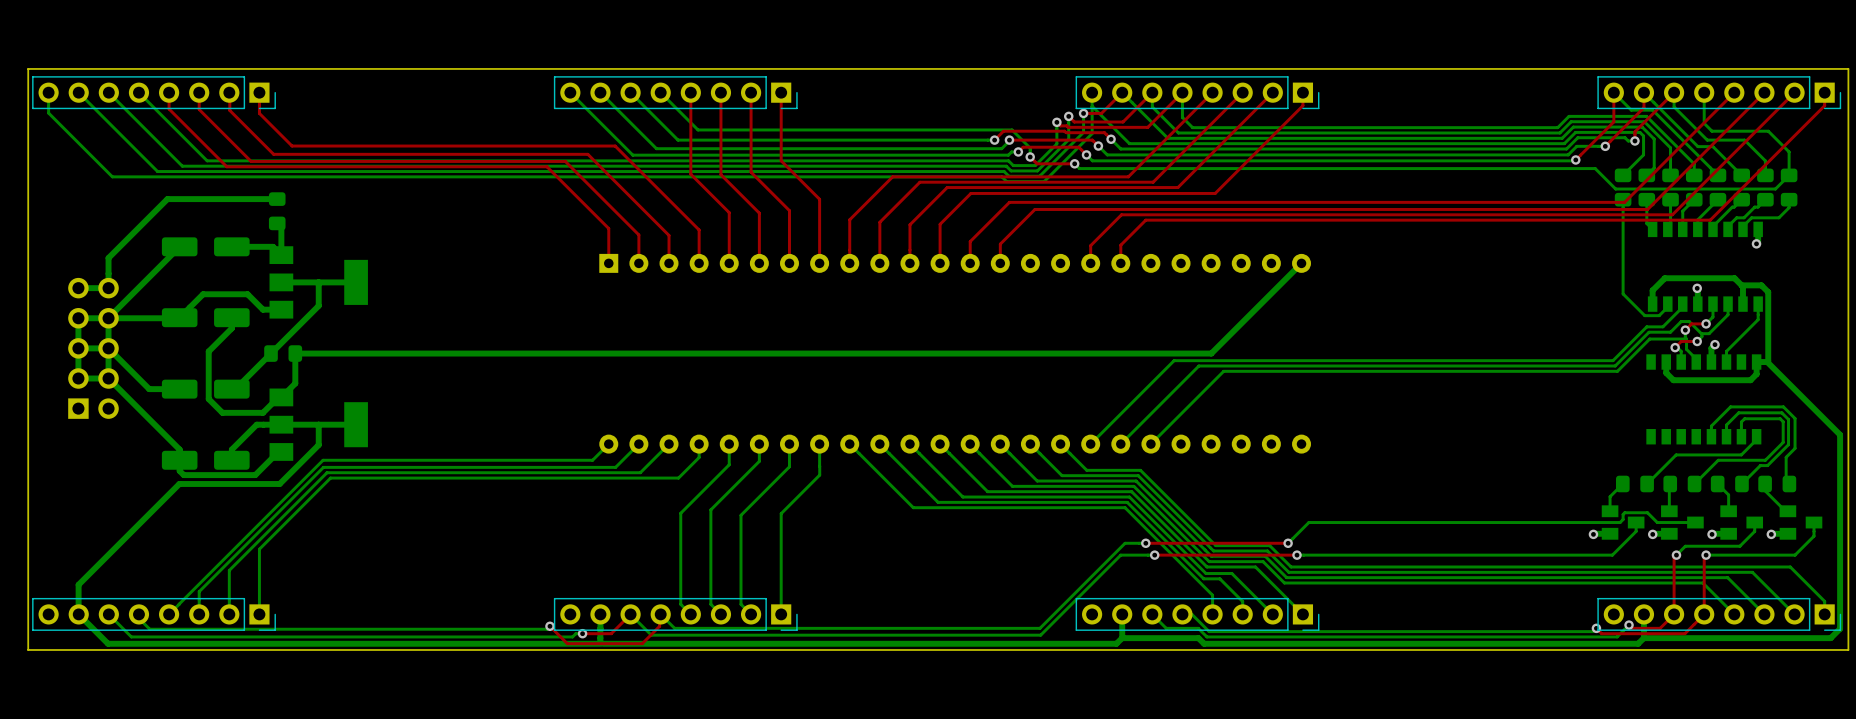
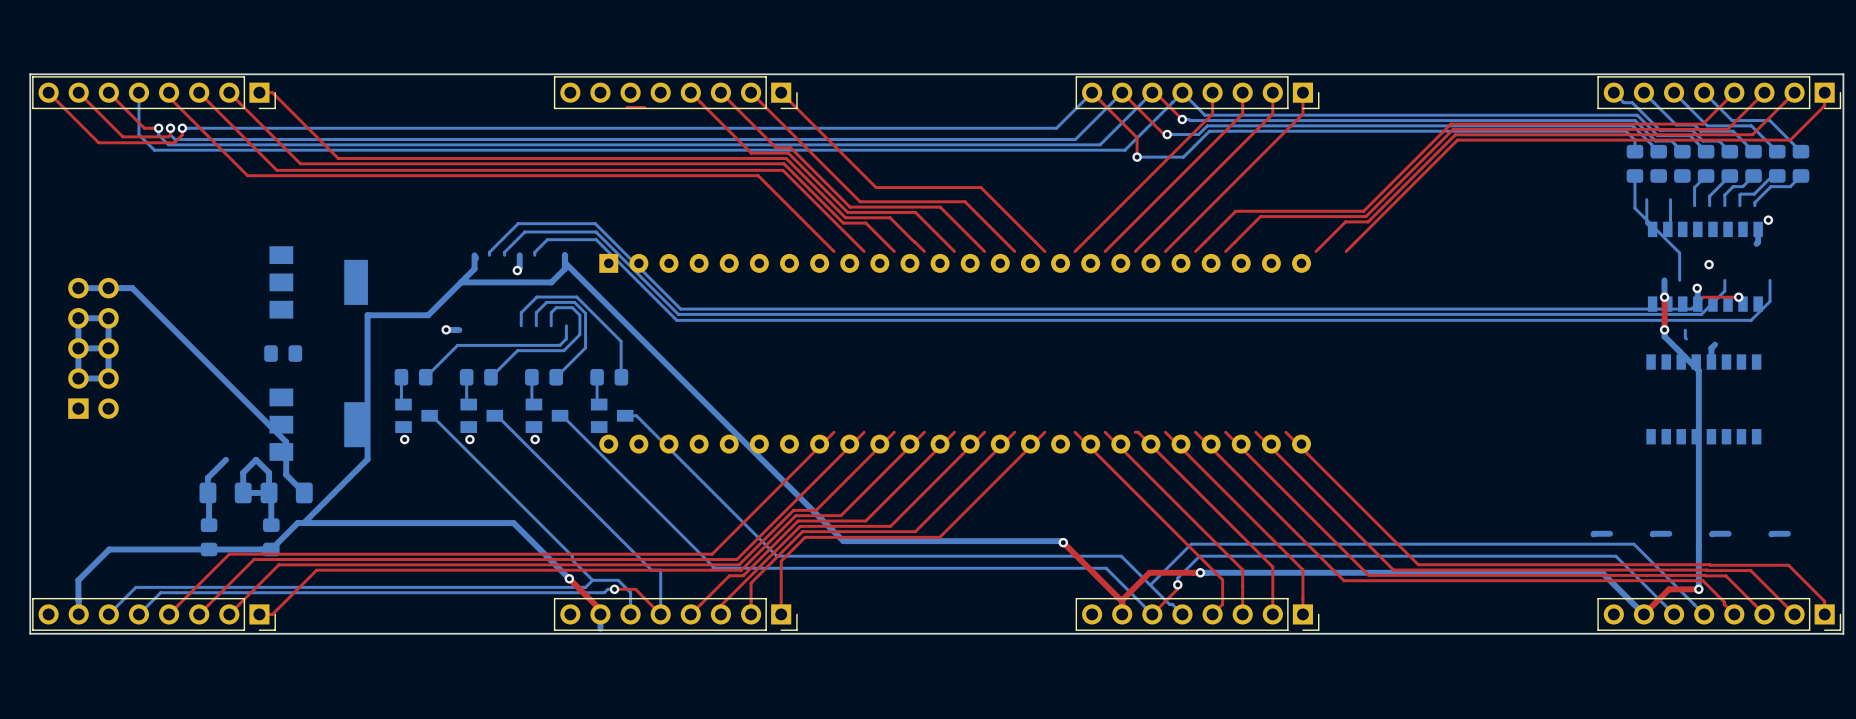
board edge: (28, 68) (28, 649) (1848, 649) (1848, 68) (28, 68) -> (30, 74) (30, 633) (1843, 633) (1843, 74) (30, 74)
bottom track: (48, 92) (48, 113) (112, 176) (1001, 176) (1006, 181) (1044, 181) (1092, 133) (1092, 106) -> none
top track: none -> (48, 92) (98, 142) (174, 142) (182, 134) (182, 128)
bottom track: (78, 92) (157, 171) (1004, 171) (1008, 176) (1039, 176) (1083, 132) (1083, 113) -> none
top track: none -> (78, 92) (122, 136) (168, 136) (170, 128)
bottom track: (108, 92) (182, 166) (1006, 166) (1011, 170) (1037, 170) (1068, 139) (1068, 116) -> none
top track: none -> (108, 92) (144, 128) (158, 128)
bottom track: (138, 92) (207, 160) (1008, 160) (1013, 165) (1035, 165) (1056, 143) (1056, 122) -> (138, 92) (138, 134) (154, 150) (1124, 150) (1182, 92) (1204, 115) (1637, 115) (1657, 135) (1690, 135) (1706, 151)
top track: (199, 92) (199, 109) (251, 161) (565, 161) (638, 234) (638, 263) -> (199, 92) (276, 170) (783, 170) (864, 251)
top track: (259, 92) (259, 113) (292, 146) (615, 146) (699, 229) (699, 263) -> (259, 92) (272, 92) (338, 158) (786, 158) (845, 217) (890, 217) (924, 251)
bottom track: (570, 92) (632, 155) (1008, 155) (1011, 151) (1018, 151) -> none
bottom track: (600, 92) (656, 148) (1001, 148) (1009, 140) -> none
bottom track: (630, 92) (678, 140) (994, 140) -> none
bottom track: (660, 92) (698, 129) (1012, 129) (1030, 148) (1030, 157) -> none
top track: (690, 92) (690, 174) (729, 212) (729, 263) -> (690, 92) (751, 153) (788, 153) (847, 212) (915, 212) (954, 251)
top track: (720, 92) (720, 174) (759, 213) (759, 263) -> (720, 92) (776, 147) (790, 147) (849, 207) (940, 207) (984, 251)
top track: (751, 92) (751, 172) (789, 210) (789, 263) -> (751, 92) (860, 201) (965, 201) (1014, 251)
top track: (781, 92) (781, 160) (819, 199) (819, 263) -> (781, 92) (876, 187) (947, 187)
bottom track: (1092, 92) (1092, 106) (1129, 143) (1564, 143) (1575, 132) (1639, 132) (1643, 135) (1643, 154) (1623, 175) -> (1092, 92) (1056, 128) (182, 128)
top track: none -> (1092, 92) (1137, 137) (1137, 157)
bottom track: (1122, 92) (1167, 138) (1562, 138) (1573, 127) (1642, 127) (1654, 139) (1654, 167) (1646, 175) -> (1122, 92) (1075, 139) (175, 139) (170, 134) (170, 128)
top track: (1122, 92) (1101, 113) (1083, 113) -> (1122, 92) (1164, 134) (1167, 134)
bottom track: (1152, 92) (1152, 106) (1178, 132) (1559, 132) (1571, 121) (1644, 121) (1670, 147) (1670, 175) -> (1152, 92) (1100, 144) (168, 144) (158, 134) (158, 128)
top track: (1152, 92) (1122, 122) (1074, 122) (1068, 116) -> (1152, 92) (1155, 92) (1182, 119)
bottom track: (1182, 92) (1182, 117) (1192, 127) (1557, 127) (1569, 116) (1646, 116) (1694, 164) (1694, 175) -> none
top track: (1182, 92) (1147, 127) (1068, 127) (1060, 125) (1056, 122) -> none
top track: (1212, 92) (1128, 176) (892, 176) (849, 219) (849, 263) -> (1212, 92) (1212, 113) (1075, 251)
top track: (1242, 92) (1153, 182) (919, 182) (879, 222) (879, 263) -> (1242, 92) (1242, 113) (1105, 251)
top track: (1272, 92) (1177, 187) (980, 187) -> (1272, 92) (1272, 113) (1135, 251)
top track: (1613, 92) (1613, 121) (1575, 159) -> none
top track: (1643, 92) (1643, 107) (1605, 146) -> none
bottom track: (1674, 92) (1674, 106) (1707, 140) (1744, 140) (1765, 160) (1765, 175) -> (1674, 92) (1707, 125) (1751, 125) (1778, 151)
top track: (1674, 92) (1634, 131) (1634, 140) -> none
bottom track: (1704, 92) (1704, 123) (1712, 131) -> (1676, 124) (1694, 124) (1700, 131) (1712, 131)
bottom track: none -> (1704, 92) (1732, 120) (1769, 120) (1800, 151)
top track: (229, 93) (229, 110) (273, 154) (587, 154) (669, 235) (669, 263) -> (229, 93) (300, 163) (784, 163) (843, 223) (865, 223) (894, 251)
top track: (169, 97) (169, 109) (226, 166) (547, 166) (608, 228) (608, 263) -> (169, 97) (247, 175) (758, 175) (834, 251)
bottom track: (1623, 102) (1631, 110) (1652, 110) (1717, 175) -> (1623, 102) (1632, 102) (1659, 130) (1692, 130) (1702, 140) (1719, 140) (1729, 151)
top track: (1302, 105) (1215, 193) (970, 193) (940, 224) (940, 263) -> (1302, 105) (1302, 113) (1165, 251)
top track: none -> (627, 107) (644, 107)
via: (1083, 113) -> none
via: (1068, 116) -> none
bottom track: none -> (1182, 119) (1635, 120) (1655, 140) (1671, 140) (1682, 151)
via: none -> (1182, 119)
via: (1056, 122) -> none
bottom track: (1676, 124) (1697, 146) (1712, 146) (1741, 175) -> none
top track: (1702, 124) (1624, 202) (1009, 202) (970, 241) (970, 263) -> (1702, 124) (1450, 124) (1363, 211) (1235, 211) (1195, 251)
via: none -> (158, 128)
via: none -> (170, 128)
via: none -> (182, 128)
top track: (1727, 129) (1647, 209) (1034, 209) (1000, 244) (1000, 263) -> (1727, 129) (1453, 129) (1365, 216) (1260, 216) (1225, 251)
bottom track: (1733, 131) (1768, 131) (1789, 151) (1789, 175) (1775, 189) (1615, 189) (1595, 168) (1079, 168) (1074, 163) -> (1733, 131) (1753, 151)
bottom track: none -> (1167, 134) (1198, 134) (1207, 125) (1632, 125) (1658, 151)
via: none -> (1167, 134)
top track: (1752, 134) (1672, 214) (1121, 214) (1090, 245) (1090, 263) -> (1752, 134) (1455, 134) (1368, 221) (1345, 221) (1315, 251)
bottom track: (1111, 139) (1120, 149) (1566, 149) (1577, 137) (1624, 137) (1628, 140) (1634, 140) -> none
top track: (1111, 139) (1104, 132) (1003, 131) (994, 140) -> none
via: (1111, 139) -> none
via: (994, 140) -> none
top track: (1009, 140) (1092, 140) (1098, 146) -> none
via: (1009, 140) -> none
via: (1634, 140) -> none
top track: (1790, 140) (1710, 220) (1145, 220) (1120, 245) (1120, 263) -> (1790, 140) (1457, 140) (1346, 251)
bottom track: (1098, 146) (1107, 154) (1568, 154) (1576, 146) (1605, 146) -> none
via: (1098, 146) -> none
via: (1605, 146) -> none
top track: (1018, 151) (1023, 147) (1078, 147) (1086, 154) -> none
via: (1018, 151) -> none
bottom track: none -> (1634, 151) (1634, 140) (1626, 131) (1209, 131) (1183, 157) (1137, 157)
bottom track: (1086, 154) (1092, 160) (1575, 159) -> none
via: (1086, 154) -> none
top track: (1030, 157) (1037, 163) (1074, 163) -> none
via: (1030, 157) -> none
via: none -> (1137, 157)
via: (1575, 159) -> none
via: (1074, 163) -> none
part: none -> (1634, 163)
part: none -> (1658, 163)
part: none -> (1682, 163)
part: none -> (1706, 163)
part: none -> (1729, 163)
part: none -> (1753, 163)
part: none -> (1777, 163)
part: none -> (1800, 163)
bottom track: none -> (1634, 175) (1634, 208) (1679, 252) (1679, 280)
bottom track: none -> (1753, 175) (1742, 186) (1733, 186) (1724, 195) (1724, 205)
bottom track: none -> (1777, 175) (1772, 175) (1754, 194) (1740, 194) (1739, 205)
bottom track: none -> (1800, 175) (1790, 186) (1770, 186) (1754, 202) (1754, 205)
top track: (947, 187) (909, 224) (909, 263) -> none
top track: none -> (980, 187) (1044, 251)
part: (1623, 187) -> none
part: (1646, 187) -> none
part: (1670, 187) -> none
part: (1694, 187) -> none
part: (1717, 187) -> none
part: (1741, 187) -> none
part: (1765, 187) -> none
part: (1789, 187) -> none
bottom track: (277, 199) (167, 199) (108, 258) (108, 288) -> (304, 492) (286, 474) (286, 442) (132, 288) (108, 288)
bottom track: (1623, 199) (1623, 293) (1644, 315) (1659, 315) (1667, 307) (1667, 304) -> none
bottom track: (1694, 199) (1682, 211) (1682, 229) -> (1706, 175) (1694, 187) (1694, 205)
bottom track: (1717, 199) (1697, 219) (1697, 229) -> (1729, 175) (1709, 196) (1709, 205)
bottom track: (1741, 199) (1712, 226) (1712, 229) -> none
bottom track: (1765, 199) (1744, 217) (1736, 217) (1728, 226) (1728, 229) -> none
bottom track: (1789, 199) (1789, 207) (1778, 217) (1751, 217) (1742, 226) (1742, 229) -> none
part: (277, 211) -> none
via: none -> (1768, 220)
bottom track: (277, 223) (281, 227) (281, 255) (273, 246) (231, 246) -> none
via: (1756, 243) -> none
bottom track: (179, 246) (108, 318) (179, 318) (203, 294) (247, 294) (263, 309) (281, 309) -> none
part: (205, 246) -> none
bottom track: none -> (474, 255) (474, 268) (428, 315) (367, 315) (367, 459) (303, 523)
bottom track: none -> (489, 255) (489, 252) (518, 223) (595, 223) (680, 309) (1691, 309) (1703, 297)
bottom track: none -> (504, 255) (504, 252) (524, 232) (596, 232) (678, 314) (1701, 314) (1724, 291) (1724, 280)
bottom track: none -> (519, 255) (519, 268) (517, 270)
bottom track: none -> (534, 255) (534, 252) (547, 239) (596, 239) (676, 320) (1751, 320) (1770, 301) (1770, 280)
bottom track: none -> (564, 255) (564, 268) (551, 282) (461, 282)
bottom track: none -> (564, 262) (843, 541) (1063, 542)
bottom track: (1301, 263) (1211, 353) (295, 353) (295, 383) (263, 412) (222, 412) (208, 399) (208, 351) (231, 328) (231, 317) (243, 317) -> none
via: none -> (1709, 264)
via: none -> (517, 270)
bottom track: none -> (1664, 280) (1664, 297)
bottom track: (281, 282) (356, 282) -> none
bottom track: (318, 282) (318, 305) (235, 389) (231, 389) -> none
bottom track: (1741, 285) (1761, 285) (1768, 292) (1767, 362) -> none
top track: none -> (1664, 297) (1664, 329)
via: none -> (1664, 297)
top track: none -> (1703, 297) (1738, 297)
via: none -> (1738, 297)
bottom track: (1652, 304) (1652, 290) (1664, 278) (1734, 278) (1742, 286) (1742, 304) -> none
bottom track: (1682, 304) (1682, 307) (1662, 326) (1646, 326) (1613, 360) (1174, 360) (1090, 444) -> none
bottom track: (1712, 304) (1712, 317) (1706, 323) -> none
bottom track: (1728, 304) (1728, 314) (1709, 333) (1701, 333) -> none
bottom track: (1758, 304) (1758, 319) (1726, 351) (1726, 362) -> none
part: (205, 317) -> none
top track: (1706, 323) (1691, 323) (1685, 330) -> none
via: (1706, 323) -> none
bottom track: none -> (521, 325) (521, 312) (536, 297) (576, 297) (621, 341) (621, 377)
bottom track: none -> (536, 325) (536, 312) (546, 302) (574, 302) (585, 313) (585, 347) (556, 377)
bottom track: none -> (551, 325) (551, 312) (556, 307) (572, 307) (579, 315) (579, 334) (563, 350) (517, 350) (490, 377)
bottom track: none -> (566, 325) (566, 338) (559, 345) (457, 345) (425, 377)
bottom track: none -> (446, 329) (459, 330)
via: none -> (446, 329)
bottom track: none -> (1664, 329) (1664, 336) (1698, 370) (1698, 589)
via: none -> (1664, 329)
via: (1685, 330) -> none
bottom track: (1697, 341) (1701, 334) (1689, 321) (1681, 321) (1670, 332) (1649, 332) (1615, 366) (1198, 366) (1120, 444) -> none
top track: (1697, 341) (1681, 341) (1675, 347) -> none
via: (1697, 341) -> none
via: (1715, 344) -> none
via: (1675, 347) -> none
bottom track: (108, 348) (149, 389) (179, 389) -> none
bottom track: (1666, 362) (1666, 372) (1673, 380) (1750, 380) (1756, 374) (1756, 362) (1767, 362) -> none
bottom track: (1696, 362) (1696, 359) (1686, 349) (1686, 339) (1649, 339) (1617, 371) (1223, 371) (1150, 444) -> none
bottom track: (1767, 362) (1840, 434) (1840, 628) (1830, 638) (1643, 638) -> none
bottom track: none -> (401, 377) (401, 402) (403, 404)
part: none -> (413, 377)
bottom track: none -> (466, 377) (466, 402) (468, 404)
part: none -> (478, 377)
bottom track: none -> (531, 377) (531, 402) (533, 404)
part: none -> (544, 377)
bottom track: none -> (597, 377) (597, 402) (599, 404)
part: none -> (609, 377)
bottom track: (108, 378) (179, 449) (179, 470) (183, 475) (255, 475) (278, 451) (281, 451) -> none
part: (205, 389) -> none
part: none -> (416, 415)
bottom track: none -> (429, 415) (431, 415) (572, 556) (572, 559) (592, 580)
part: none -> (481, 415)
part: none -> (547, 415)
part: none -> (612, 415)
bottom track: (318, 424) (318, 444) (279, 483) (179, 483) (78, 584) (78, 614) (108, 643) (600, 643) -> none
bottom track: (356, 424) (256, 424) (231, 449) (231, 460) -> none
top track: none -> (834, 432) (712, 554) (229, 554) (169, 614)
top track: none -> (864, 432) (736, 559) (254, 559) (199, 614)
top track: none -> (894, 432) (816, 510) (793, 510) (739, 564) (278, 564) (229, 614)
top track: none -> (924, 432) (841, 515) (795, 515) (741, 570) (316, 570) (272, 614) (259, 614)
top track: none -> (954, 432) (865, 521) (798, 521) (743, 575) (729, 575) (690, 614)
top track: none -> (984, 432) (890, 526) (800, 526) (720, 605) (720, 614)
top track: none -> (1014, 432) (915, 531) (802, 531) (751, 583) (751, 614)
top track: none -> (1044, 432) (939, 537) (805, 537) (781, 561) (781, 614)
top track: none -> (1075, 432) (1222, 579) (1222, 604) (1212, 614)
top track: none -> (1105, 432) (1242, 569) (1242, 614)
top track: none -> (1135, 432) (1138, 432) (1272, 566) (1272, 614)
top track: none -> (1165, 432) (1302, 569) (1302, 614)
top track: none -> (1195, 432) (1344, 580) (1702, 580) (1734, 614)
top track: none -> (1225, 432) (1368, 575) (1725, 575) (1764, 614)
top track: none -> (1255, 432) (1393, 570) (1750, 570) (1794, 614)
top track: none -> (1285, 432) (1418, 564) (1788, 565) (1824, 601) (1824, 614)
bottom track: (1711, 436) (1711, 426) (1730, 406) (1783, 406) (1795, 418) (1795, 448) (1786, 457) (1786, 480) (1789, 483) -> none
bottom track: (1726, 436) (1726, 425) (1738, 412) (1781, 412) (1788, 419) (1788, 444) (1767, 465) (1760, 465) (1741, 483) -> none
bottom track: (1741, 436) (1741, 421) (1744, 418) (1780, 418) (1783, 421) (1783, 442) (1765, 460) (1718, 460) (1694, 483) -> none
bottom track: (1756, 436) (1756, 439) (1741, 454) (1676, 454) (1647, 483) -> none
via: none -> (404, 439)
via: none -> (469, 439)
via: none -> (535, 439)
bottom track: (608, 444) (592, 460) (323, 460) (179, 604) -> none
bottom track: (638, 444) (615, 467) (323, 467) (199, 591) (199, 614) -> none
bottom track: (669, 444) (640, 472) (327, 472) (229, 570) (229, 614) -> none
bottom track: (699, 444) (699, 457) (678, 478) (330, 478) (259, 549) (259, 614) -> none
bottom track: (729, 444) (729, 464) (680, 513) (680, 604) (690, 614) -> none
bottom track: (759, 444) (759, 461) (710, 509) (710, 604) (720, 614) -> none
bottom track: (789, 444) (789, 466) (740, 515) (740, 604) (751, 614) -> none
bottom track: (819, 444) (819, 466) -> none
bottom track: (849, 444) (913, 507) (1125, 507) (1212, 595) (1212, 614) -> none
bottom track: (879, 444) (938, 502) (1127, 502) (1203, 578) (1219, 578) (1242, 601) (1242, 614) -> none
bottom track: (909, 444) (962, 497) (1129, 497) (1205, 573) (1231, 573) (1272, 614) -> none
bottom track: (940, 444) (987, 491) (1131, 491) (1207, 566) (1255, 566) (1302, 614) -> none
bottom track: (970, 444) (1012, 486) (1133, 486) (1209, 561) (1263, 561) (1284, 583) (1702, 583) (1734, 614) -> none
bottom track: (1000, 444) (1037, 481) (1136, 481) (1211, 556) (1265, 556) (1286, 577) (1727, 577) (1764, 614) -> none
bottom track: (1030, 444) (1062, 475) (1138, 475) (1213, 550) (1267, 550) (1288, 572) (1752, 572) (1794, 614) -> none
bottom track: (1060, 444) (1086, 470) (1140, 470) (1215, 545) (1269, 545) (1291, 566) (1790, 566) (1824, 601) (1824, 614) -> none
bottom track: none -> (226, 459) (207, 477) (209, 525)
part: (205, 460) -> none
bottom track: (819, 466) (819, 475) (781, 513) (781, 614) -> none
bottom track: (1622, 483) (1610, 496) (1610, 511) -> none
part: (1634, 483) -> none
bottom track: (1670, 483) (1669, 511) -> none
part: (1682, 483) -> none
bottom track: (1717, 483) (1728, 494) (1728, 511) -> none
part: (1729, 483) -> none
bottom track: (1765, 483) (1765, 490) (1785, 511) (1787, 511) -> none
part: (1777, 483) -> none
part: none -> (225, 492)
part: none -> (286, 492)
bottom track: none -> (269, 495) (269, 472) (256, 459) (243, 472) (243, 492) (269, 492) (271, 495) (271, 525)
part: (1623, 522) -> none
bottom track: (1636, 522) (1636, 531) (1612, 555) (1297, 555) -> none
part: (1682, 522) -> none
bottom track: (1695, 522) (1657, 522) (1647, 512) (1624, 512) (1620, 522) (1308, 522) (1288, 543) -> none
part: (1741, 522) -> none
bottom track: (1754, 522) (1754, 531) (1739, 546) (1685, 546) (1676, 555) -> none
part: (1800, 522) -> none
bottom track: (1814, 522) (1814, 536) (1795, 555) (1706, 555) -> none
via: (1593, 534) -> none
via: (1652, 534) -> none
via: (1712, 534) -> none
via: (1771, 534) -> none
part: none -> (209, 537)
part: none -> (271, 537)
top track: none -> (1063, 542) (1122, 601)
via: none -> (1063, 542)
bottom track: (1145, 543) (1125, 543) (1039, 628) (674, 628) (660, 614) -> (494, 415) (497, 415) (651, 570) (660, 570) (660, 614)
top track: (1145, 543) (1288, 543) -> none
via: (1145, 543) -> none
via: (1288, 543) -> none
bottom track: (1154, 555) (1120, 555) (1040, 635) (651, 635) (630, 614) -> (592, 580) (618, 580) (630, 592) (630, 614)
top track: (1154, 555) (1297, 555) -> none
via: (1154, 555) -> none
via: (1297, 555) -> none
top track: (1676, 555) (1674, 557) (1674, 614) (1660, 628) (1632, 628) (1629, 625) -> none
via: (1676, 555) -> none
top track: (1706, 555) (1704, 557) (1704, 614) (1684, 633) (1601, 633) (1596, 628) -> none
via: (1706, 555) -> none
top track: none -> (1200, 572) (1149, 572) (1122, 600) (1122, 614)
via: none -> (1200, 572)
bottom track: none -> (569, 578) (513, 523) (297, 523) (271, 549) (109, 549) (78, 580) (78, 614)
top track: none -> (569, 578) (600, 609) (600, 614)
via: none -> (569, 578)
bottom track: none -> (1150, 584) (1191, 544) (1633, 544) (1704, 614)
bottom track: none -> (1177, 584) (1177, 578) (1199, 556) (1615, 556) (1674, 614)
top track: none -> (1177, 584) (1177, 589) (1152, 614)
via: none -> (1177, 584)
via: none -> (614, 589)
top track: none -> (1698, 589) (1669, 589) (1643, 614)
via: none -> (1698, 589)
bottom track: (108, 614) (131, 636) (572, 636) (575, 633) (582, 633) -> (108, 614) (135, 587) (585, 587) (592, 580)
bottom track: (138, 614) (138, 618) (149, 629) (547, 629) (549, 626) -> (138, 614) (160, 592) (604, 592) (607, 589) (614, 589)
top track: (630, 614) (611, 633) (582, 633) -> none
top track: (660, 614) (659, 626) (642, 643) (567, 643) (549, 626) -> (660, 614) (635, 589) (614, 589)
bottom track: (1122, 614) (1122, 638) (1116, 643) (603, 643) -> none
bottom track: (1152, 614) (1166, 628) (1198, 628) (1206, 636) (1617, 636) (1629, 625) -> (1152, 614) (1106, 568) (713, 568) (562, 415) (560, 415)
bottom track: (1182, 614) (1191, 614) (1209, 631) (1593, 631) (1596, 628) -> (1182, 614) (1172, 604) (1169, 604) (1121, 556) (776, 556) (636, 415) (625, 415)
bottom track: (1643, 614) (1643, 638) (1638, 643) (1204, 643) (1198, 638) (1122, 638) -> (1643, 614) (1602, 572) (1200, 572)
via: (1629, 625) -> none
via: (549, 626) -> none
bottom track: (600, 628) (600, 641) -> none
via: (1596, 628) -> none
via: (582, 633) -> none

